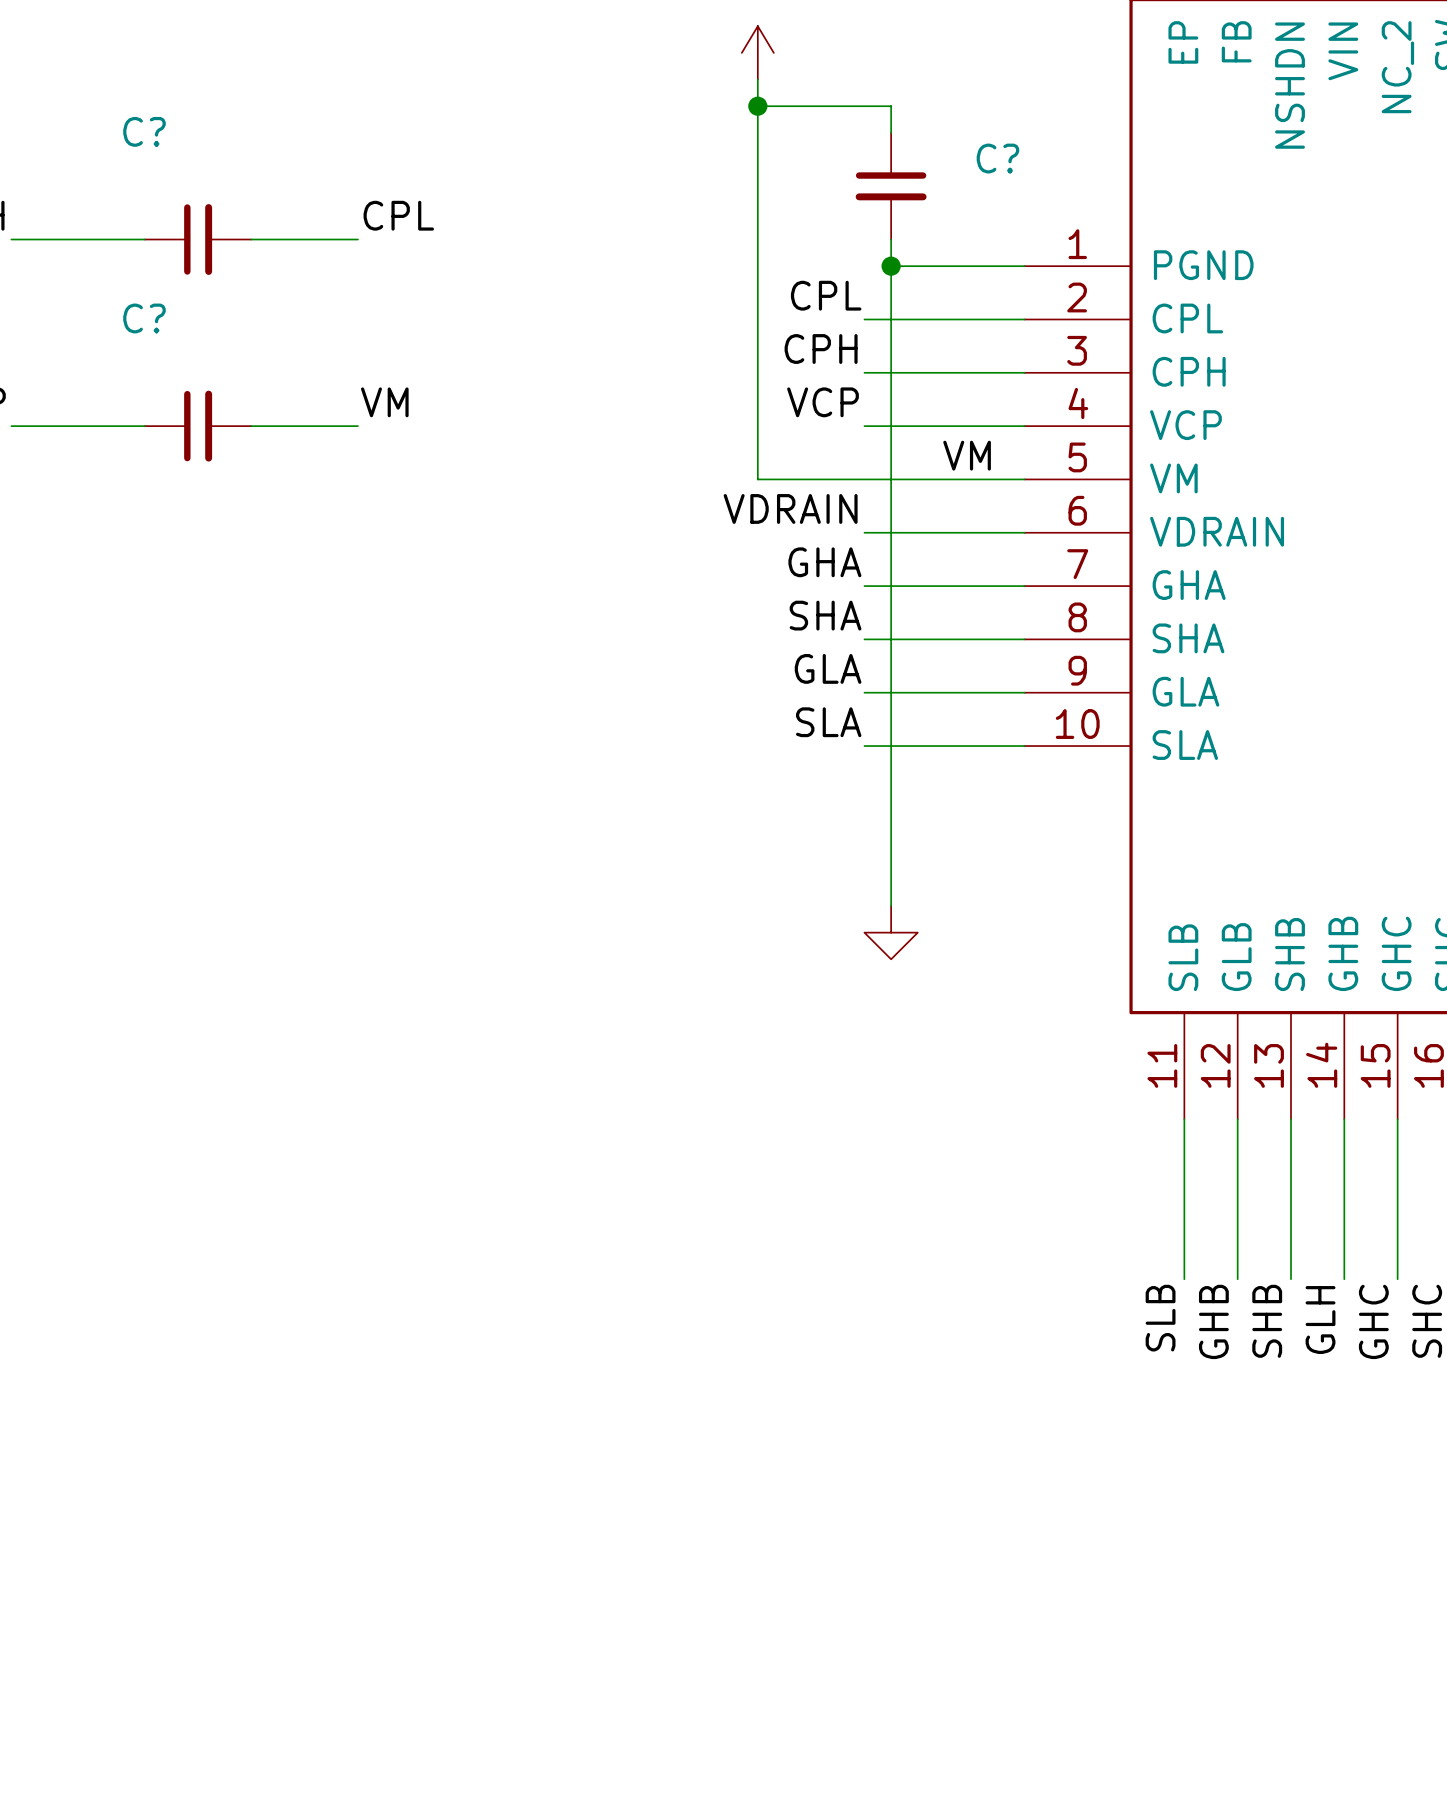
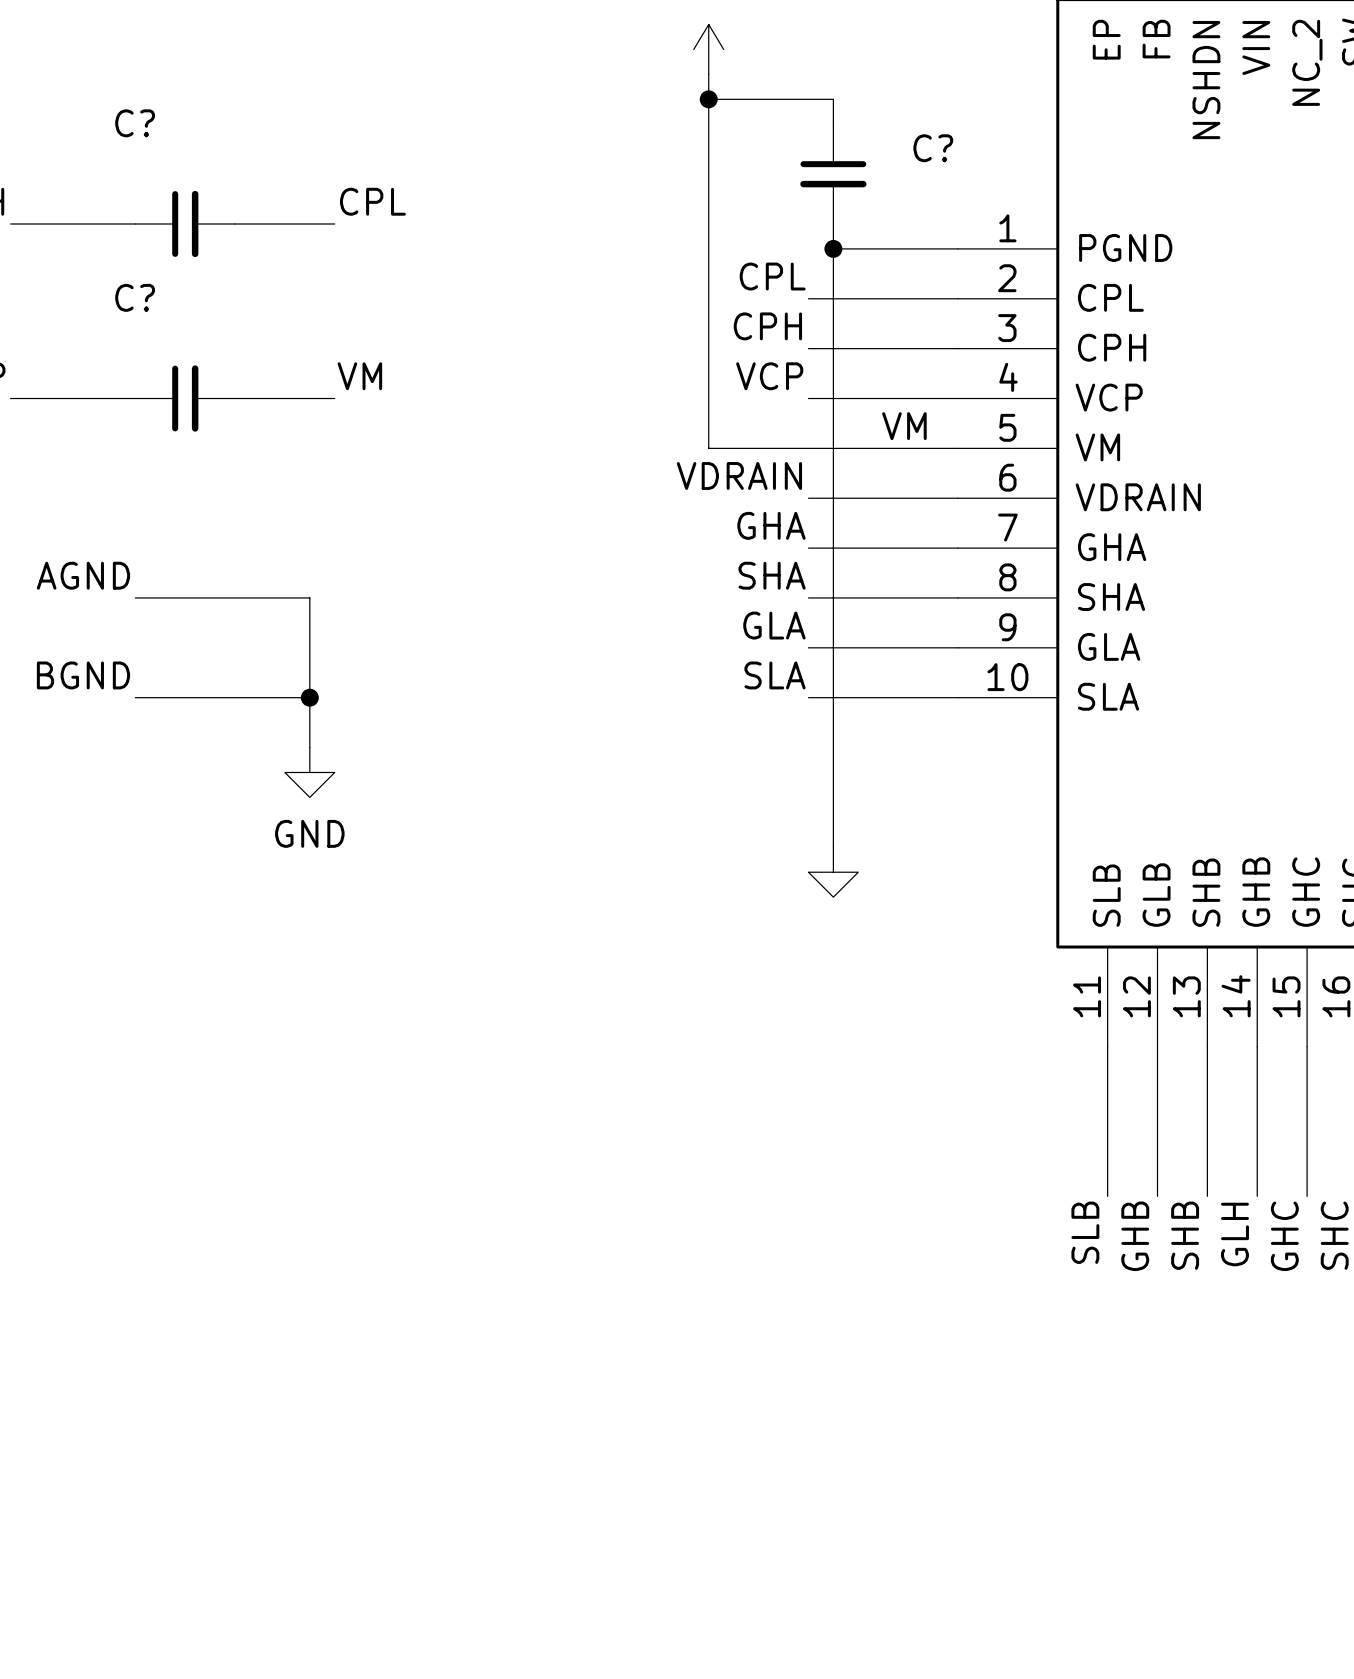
label: none -> AGND (83, 575)
wire: none -> (135, 597) (309, 597) (309, 747)
label: none -> BGND (83, 675)
wire: none -> (135, 697) (309, 697)
junction: none -> (309, 697)
power symbol: none -> GND (309, 772)

